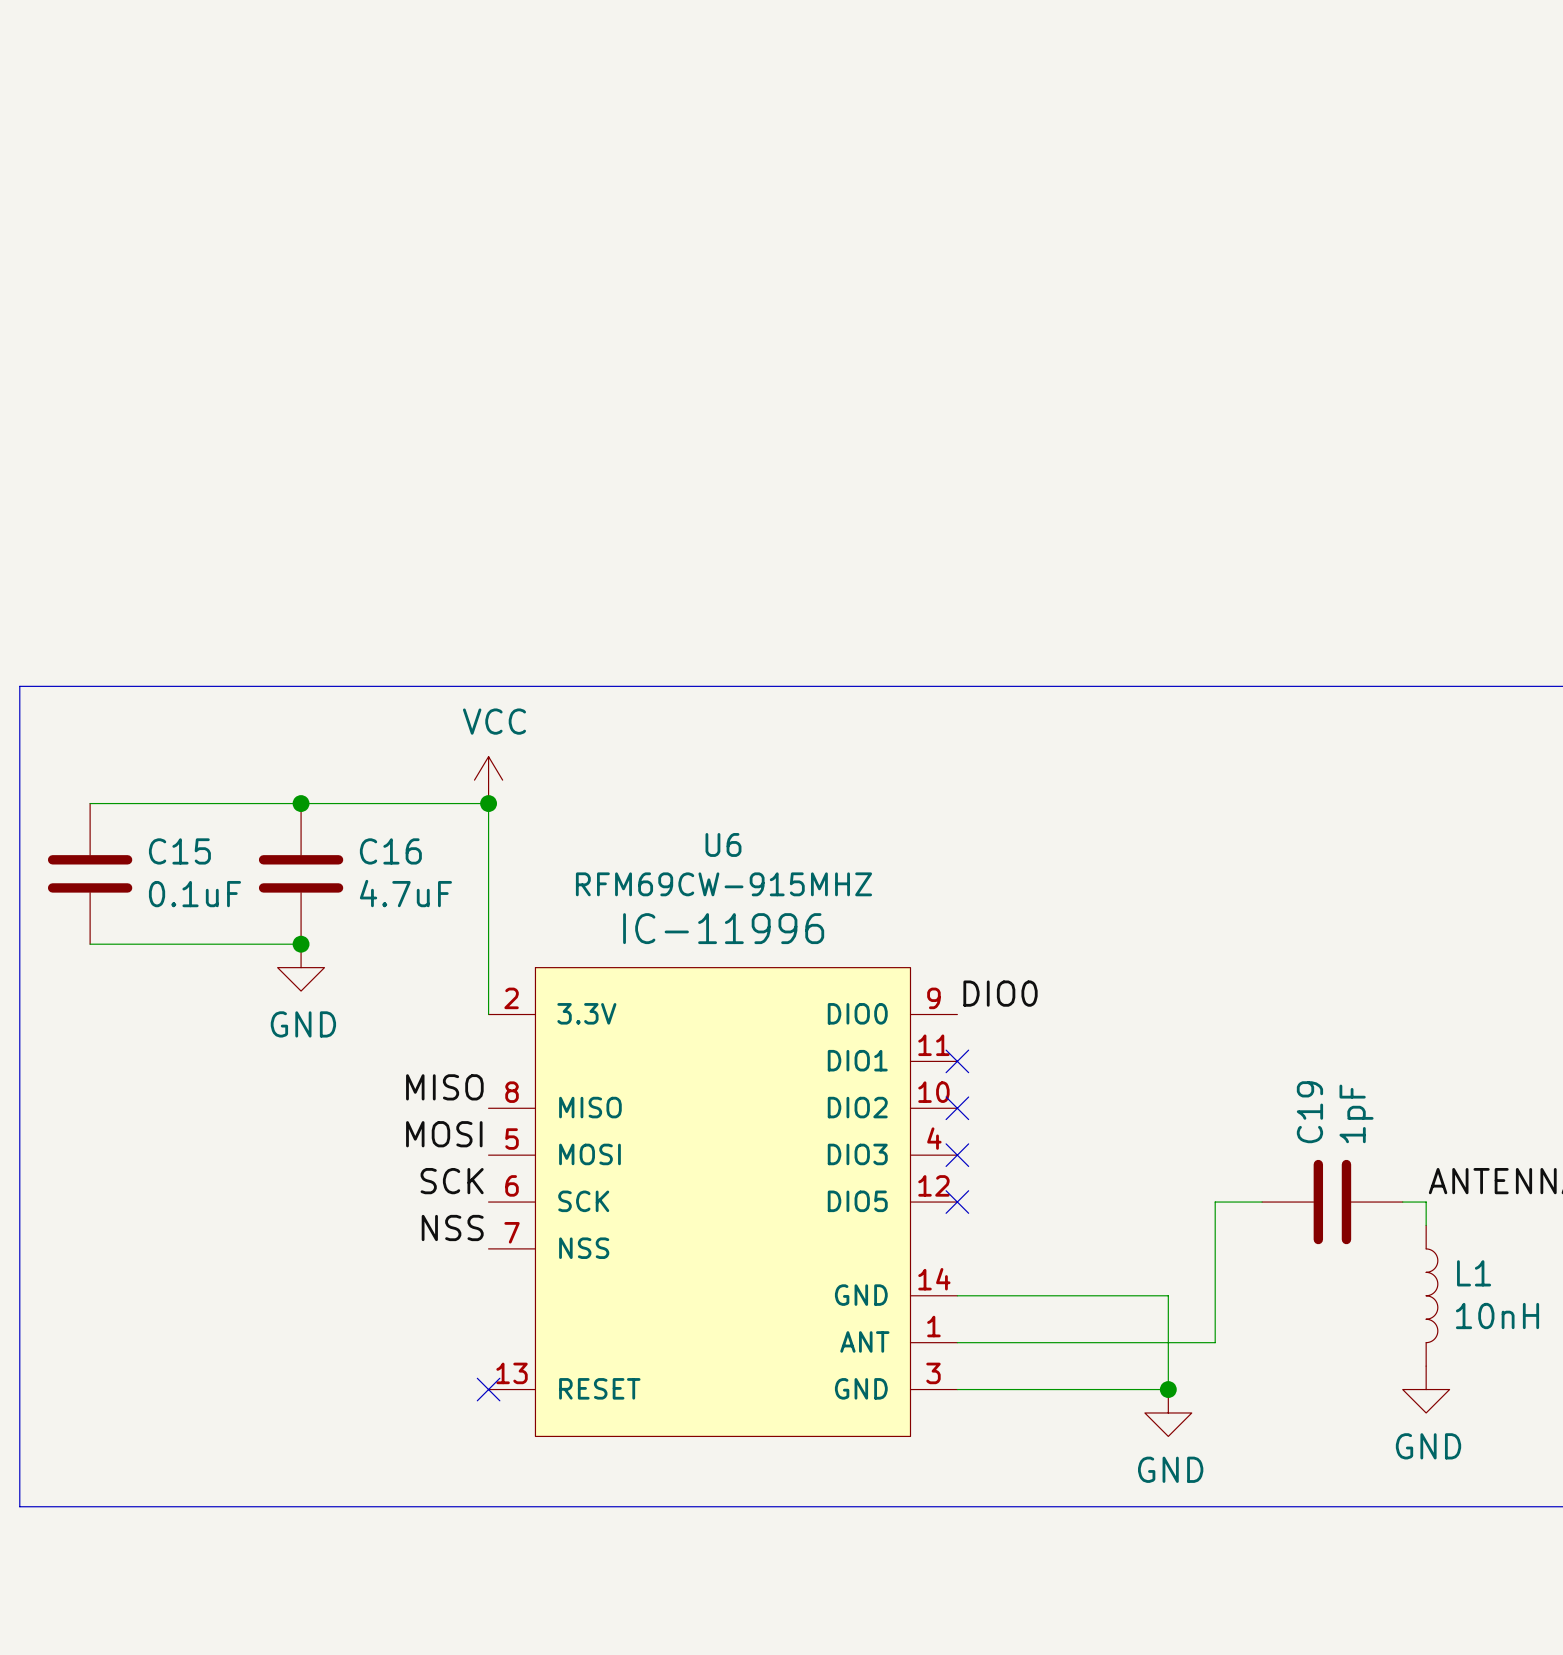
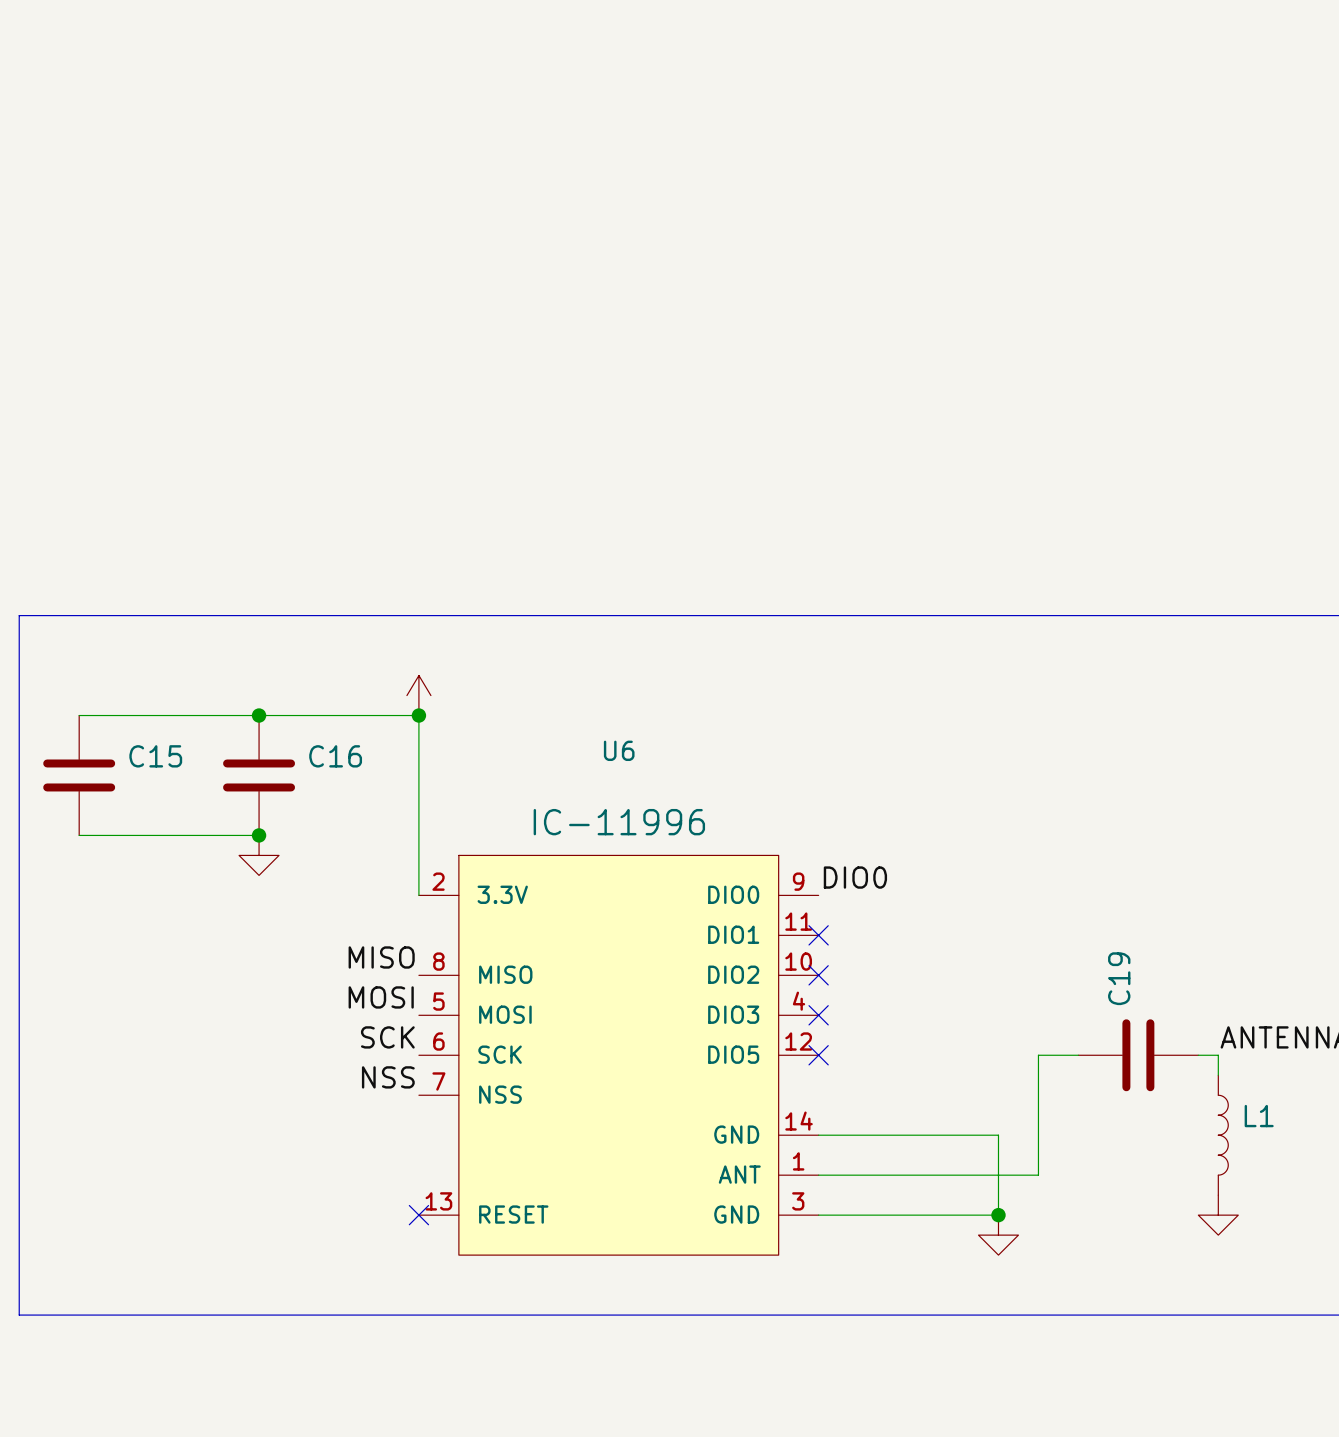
power symbol text: VCC (494, 721) -> none
U6 value: RFM69CW-915MHZ (723, 884) -> none
C16 value: 4.7uF (405, 893) -> none
C15 value: 0.1uF (194, 894) -> none
power symbol text: GND (303, 1024) -> none
C19 value: 1pF (1356, 1113) -> none
L1 value: 10nH (1497, 1316) -> none
power symbol text: GND (1428, 1446) -> none
power symbol text: GND (1170, 1469) -> none

